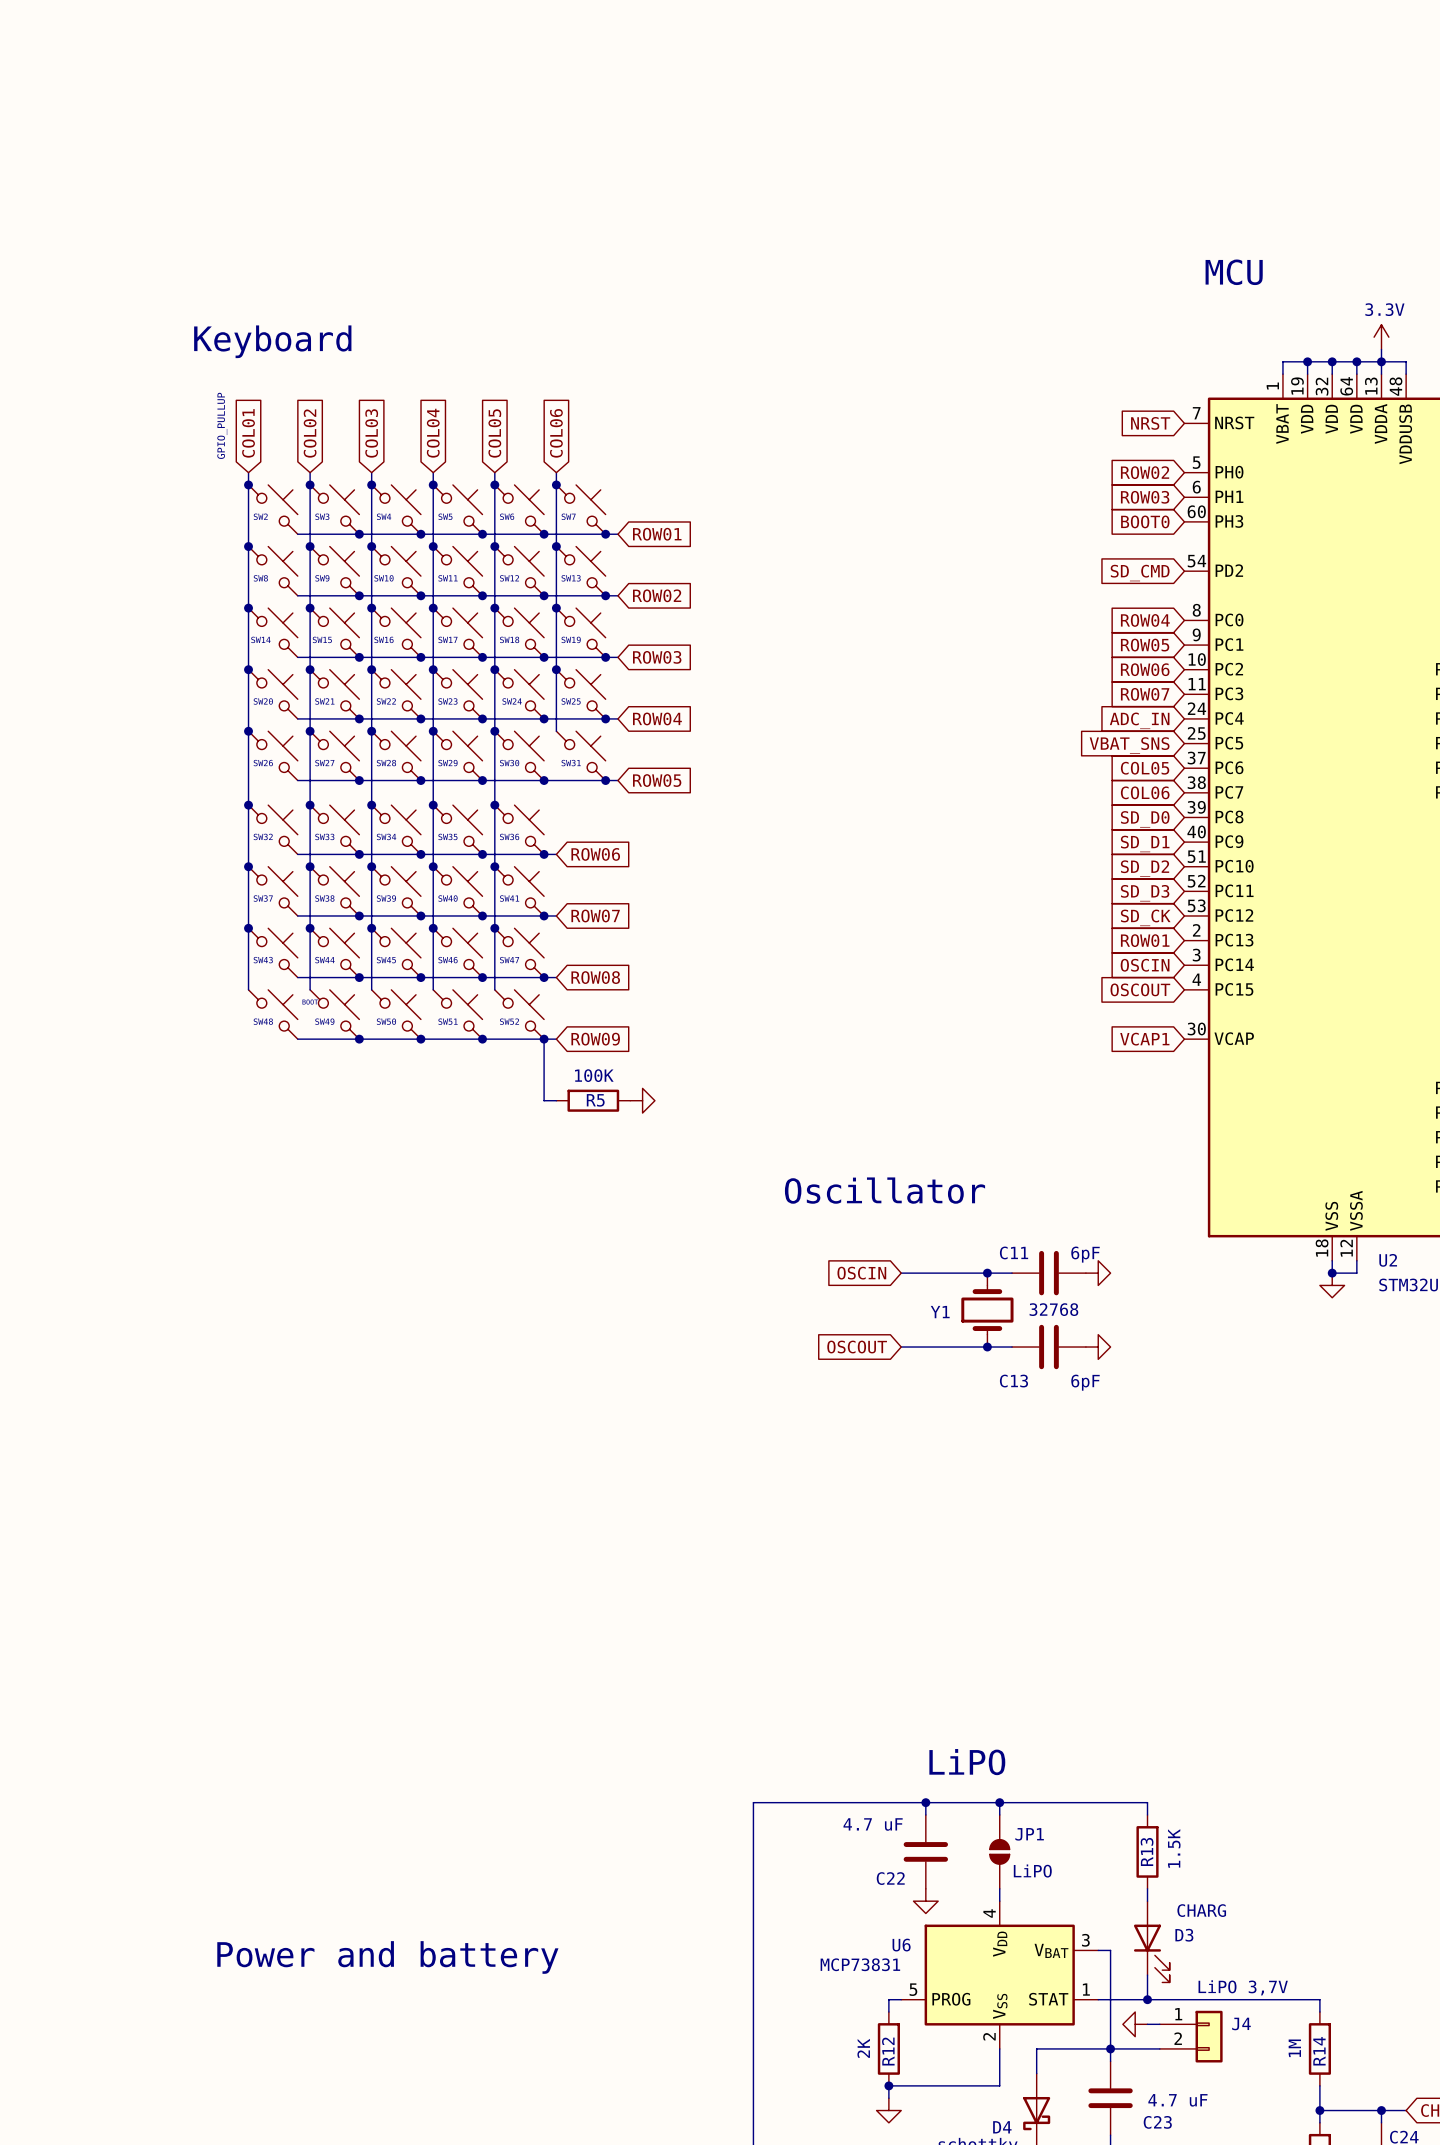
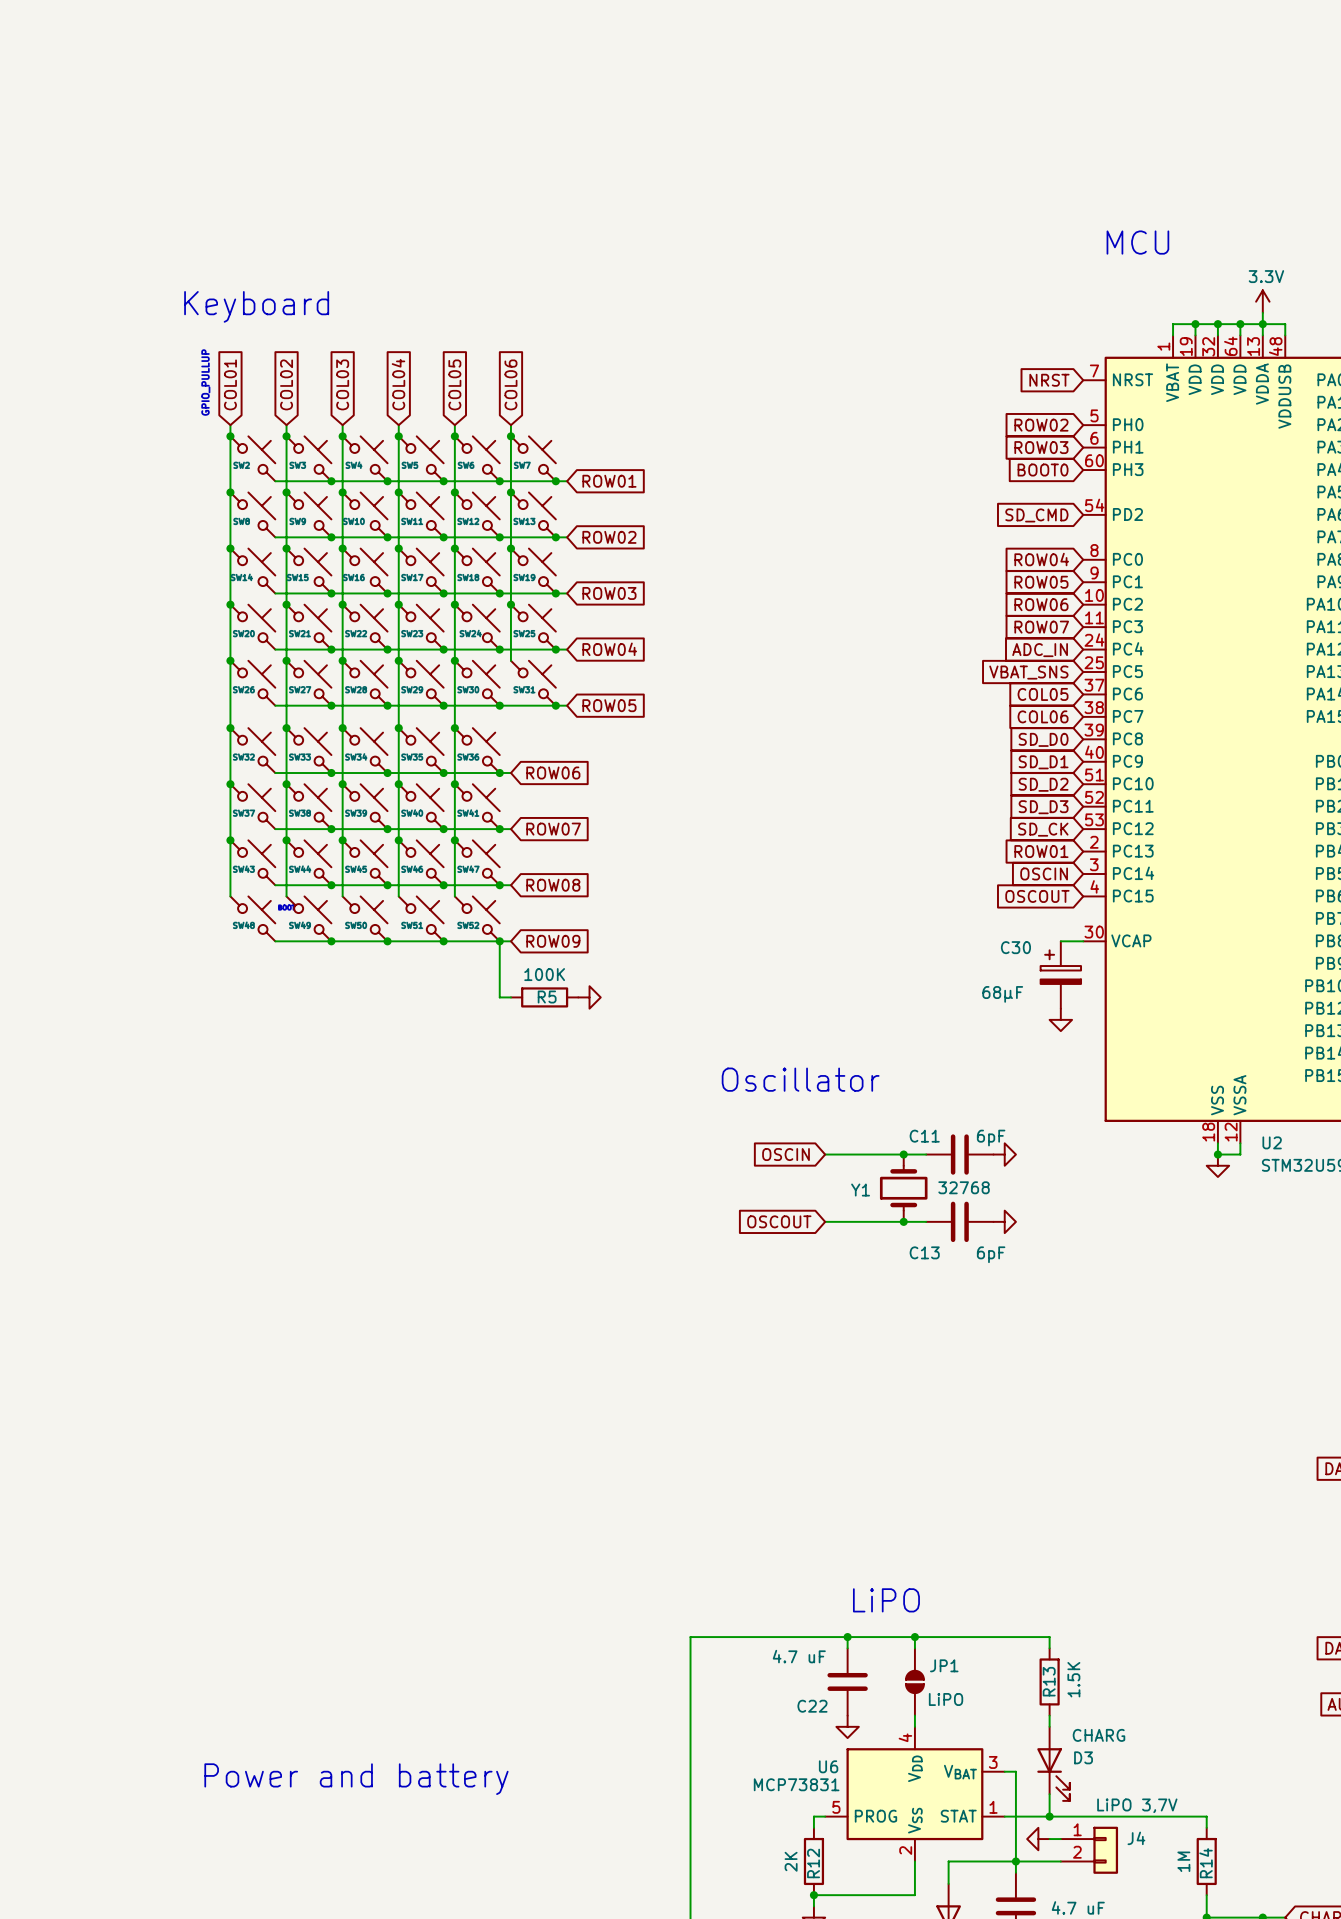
global label: VCAP1 (1144, 1039) -> none
wire: none -> (1060, 941) (1083, 941)
C30: none -> 68µF (1060, 974)
power symbol: none -> (1060, 1019)

